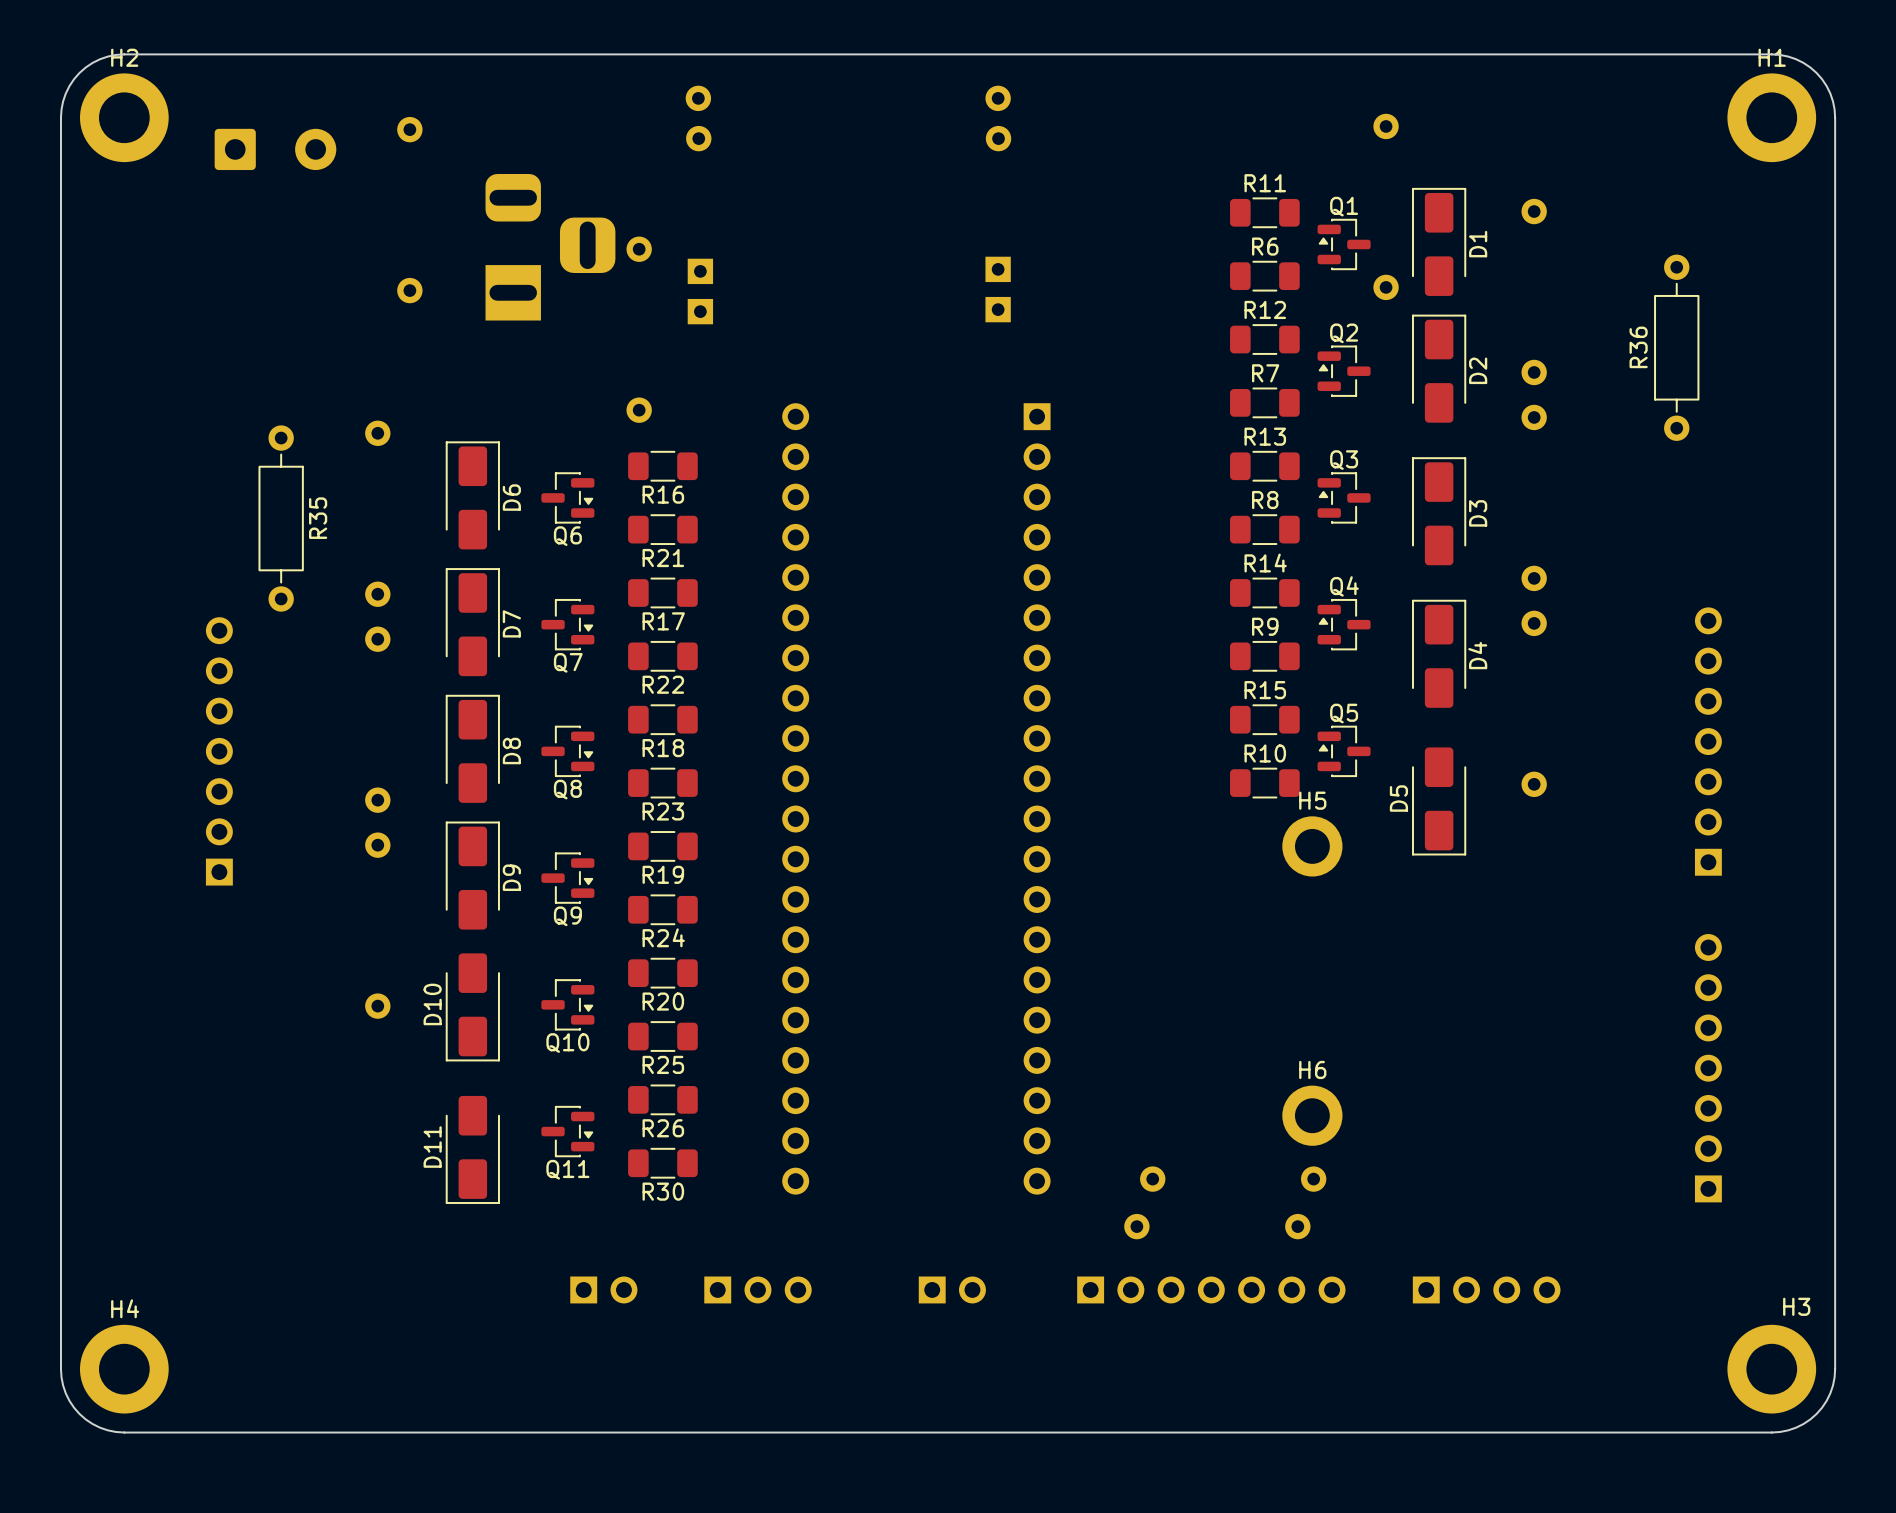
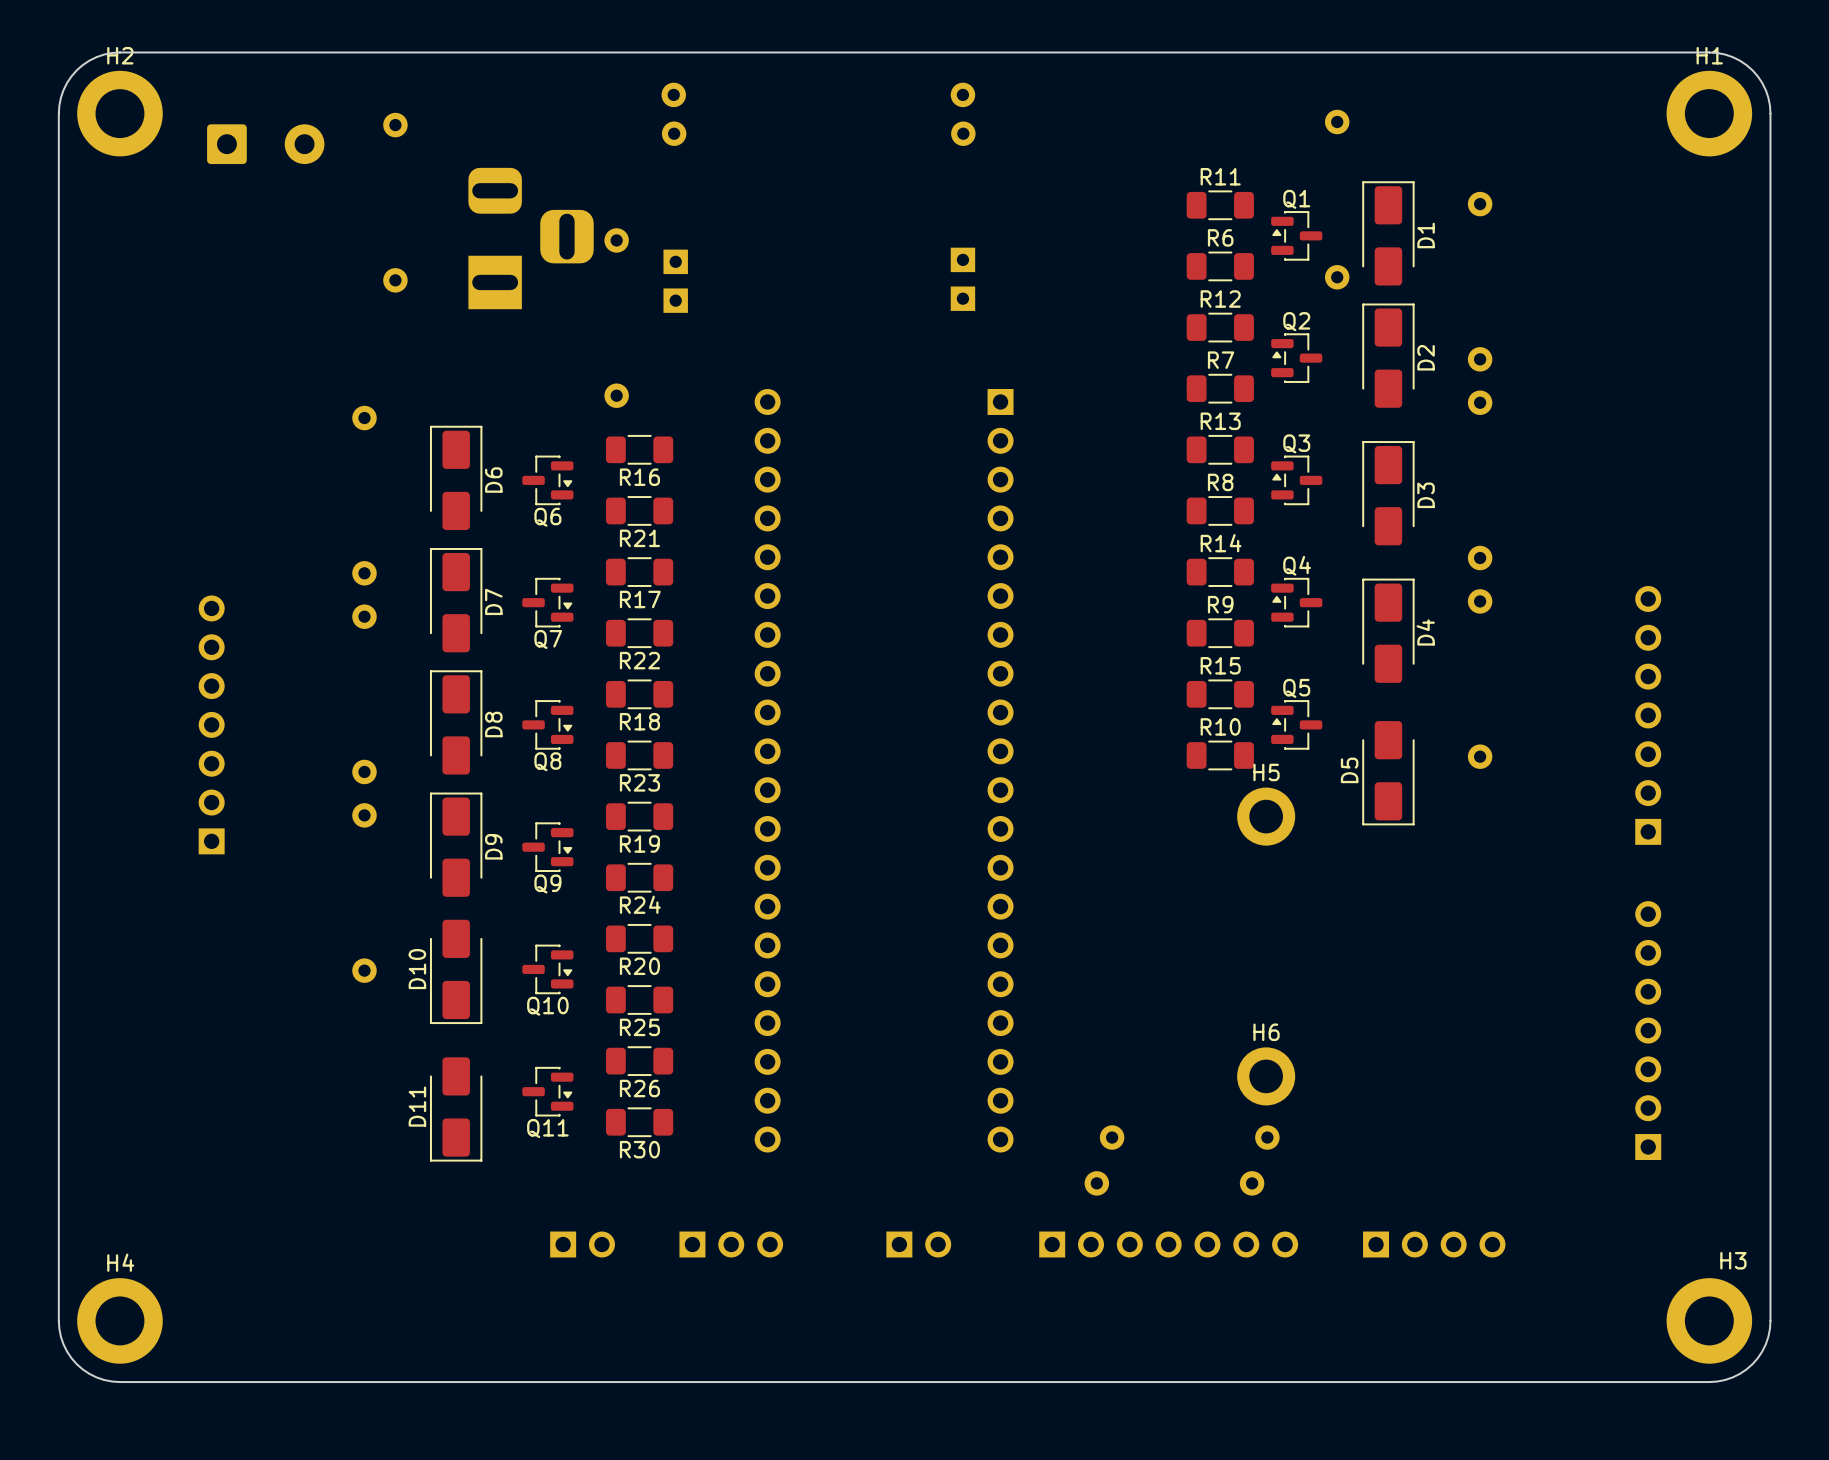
R36: (1676, 347) -> none
R35: (281, 518) -> none

